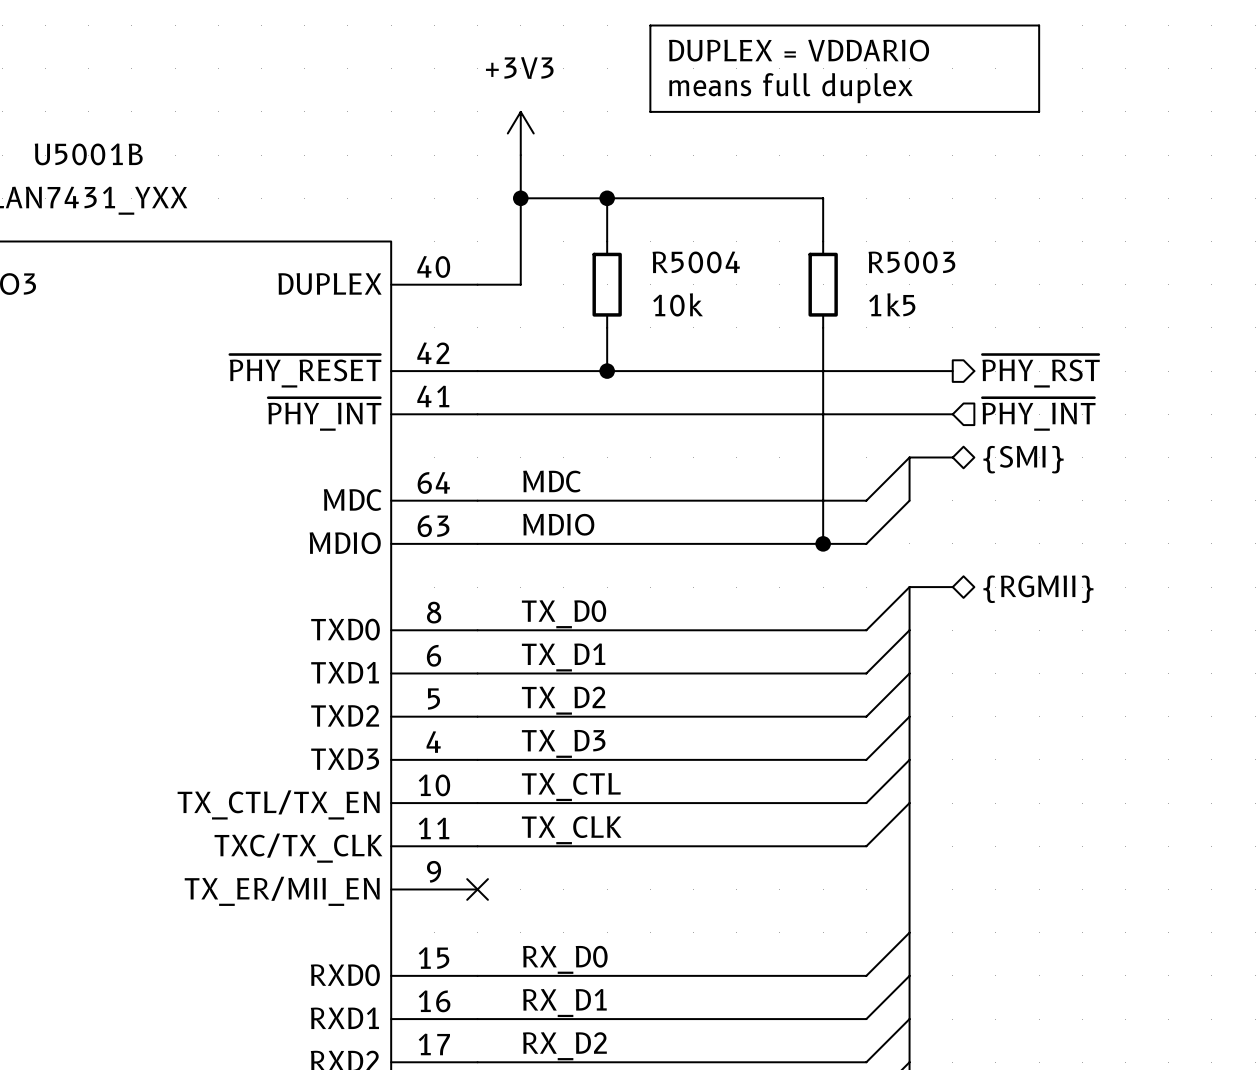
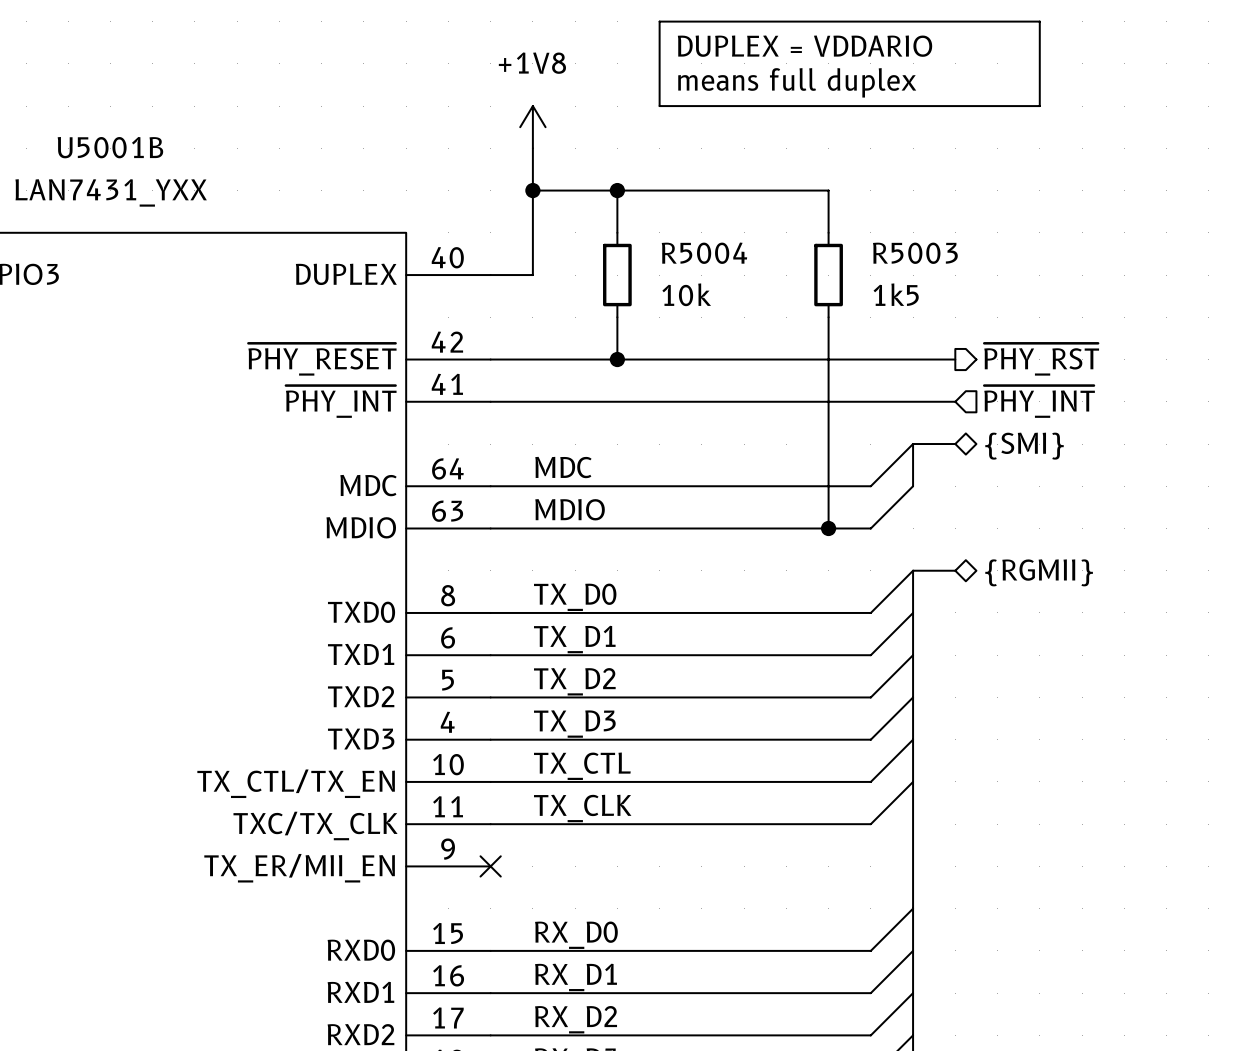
power symbol: +3V3 (520, 133) -> +1V8 (532, 127)

